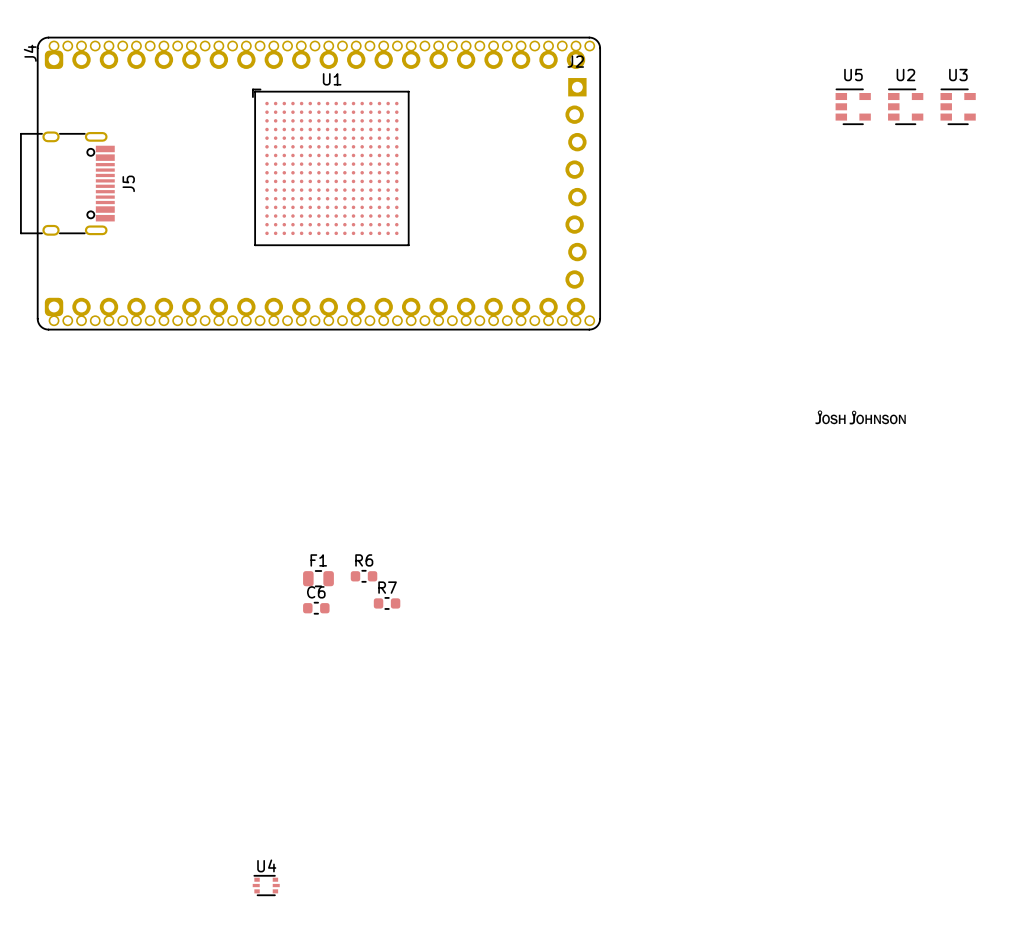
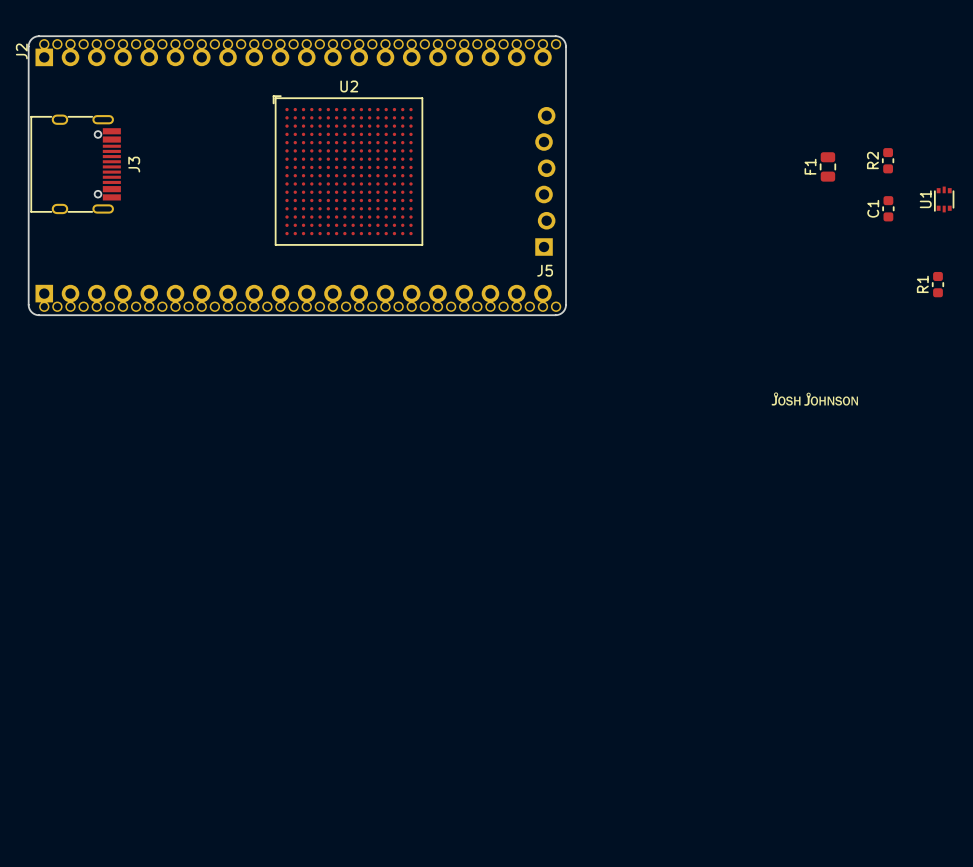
J4: (319, 54) -> none
J2 name position: J2 (575, 61) -> J2 (21, 51)
U2 name position: U2 (905, 75) -> U2 (349, 86)
J2 footprint: [565, 78, 587, 289] -> [35, 39, 562, 67]
U1 name position: U1 (332, 79) -> U1 (925, 199)
U1 footprint: [252, 88, 410, 246] -> [934, 186, 955, 213]
U2 footprint: [888, 88, 924, 125] -> [272, 95, 423, 246]
U5: (853, 106) -> none
U3: (958, 106) -> none
J5 footprint: [20, 131, 115, 236] -> [535, 106, 556, 256]
R2: none -> (888, 160)
J3: none -> (75, 164)
J5 name position: J5 (128, 183) -> J5 (545, 270)
C1: none -> (888, 208)
part footprint: [44, 297, 596, 327] -> [35, 284, 562, 312]
R1: none -> (937, 284)
F1 name position: F1 (318, 560) -> F1 (810, 166)
R6: (364, 576) -> none
F1 rotation: 0° (318, 578) -> 90° clockwise (827, 166)
F1 position: (318, 578) -> (827, 166)
R7: (387, 603) -> none
C6: (316, 608) -> none
U4: (266, 885) -> none

